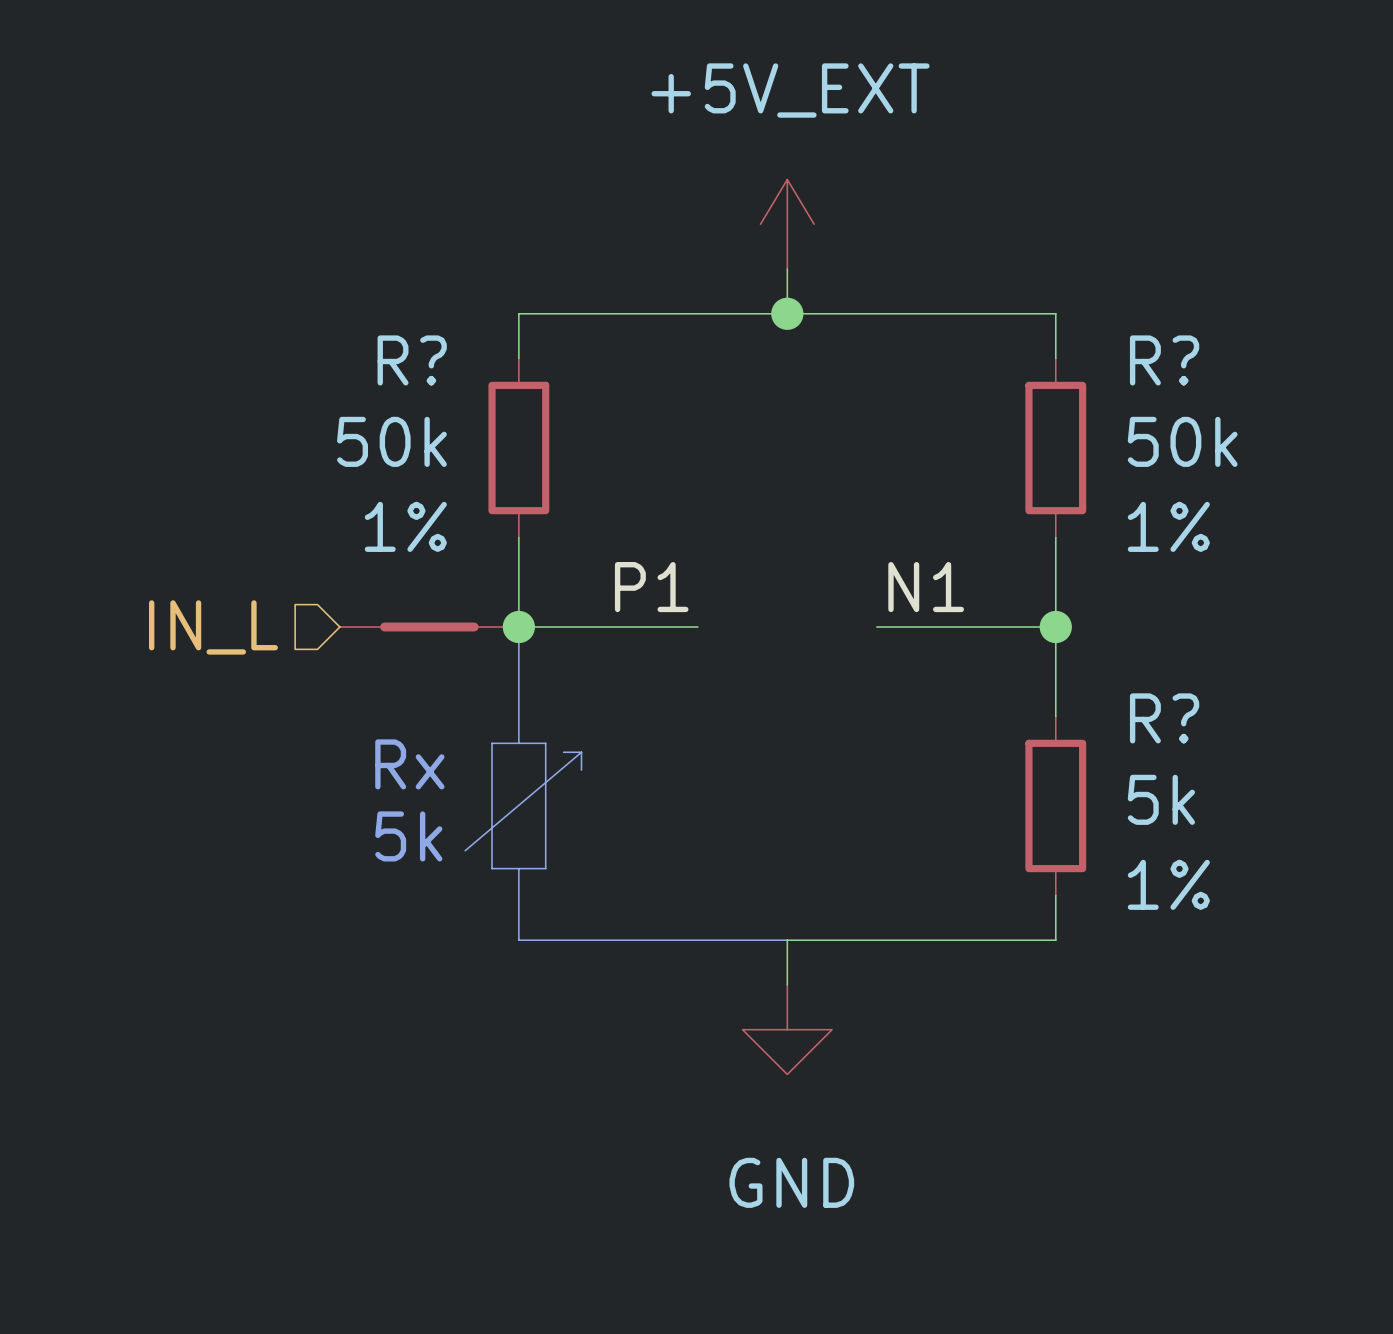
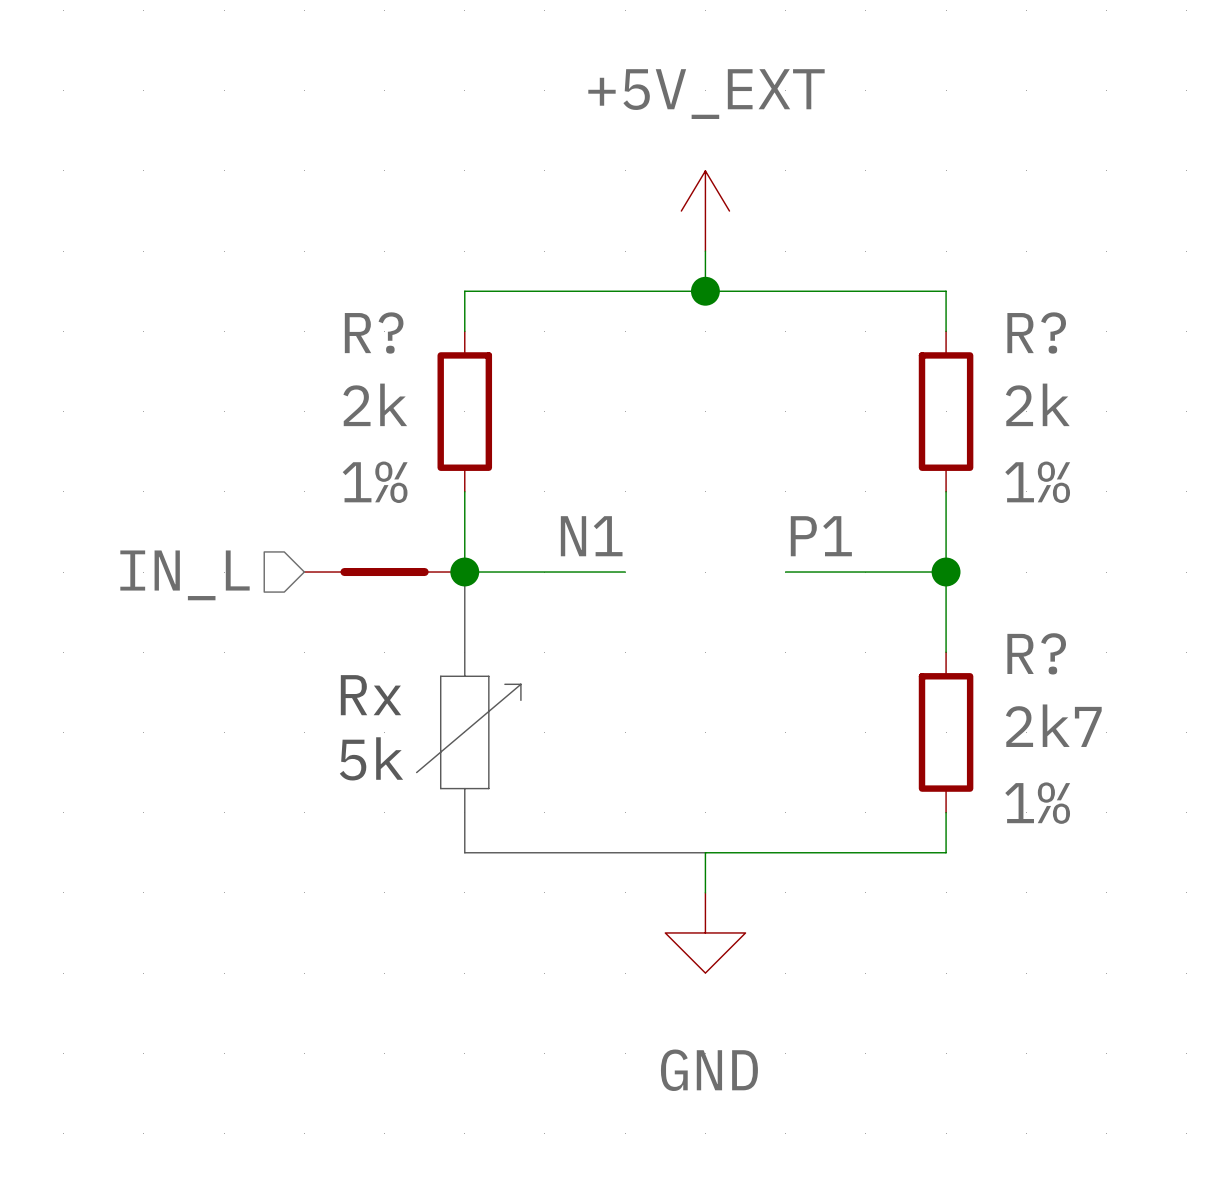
R? value: 50k (391, 441) -> 2k (375, 404)
R? value: 50k (1182, 441) -> 2k (1037, 404)
label: P1 (651, 587) -> N1 (591, 536)
label: N1 (926, 587) -> P1 (821, 536)
R? value: 5k (1161, 799) -> 2k7 (1053, 725)

